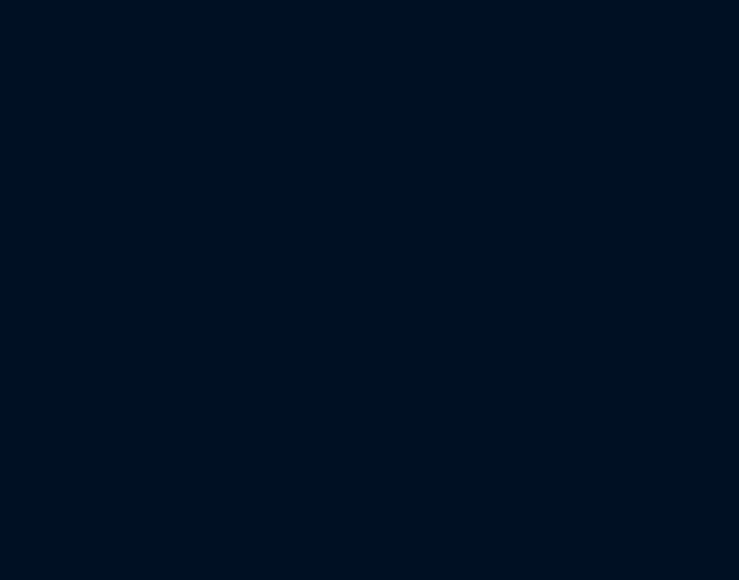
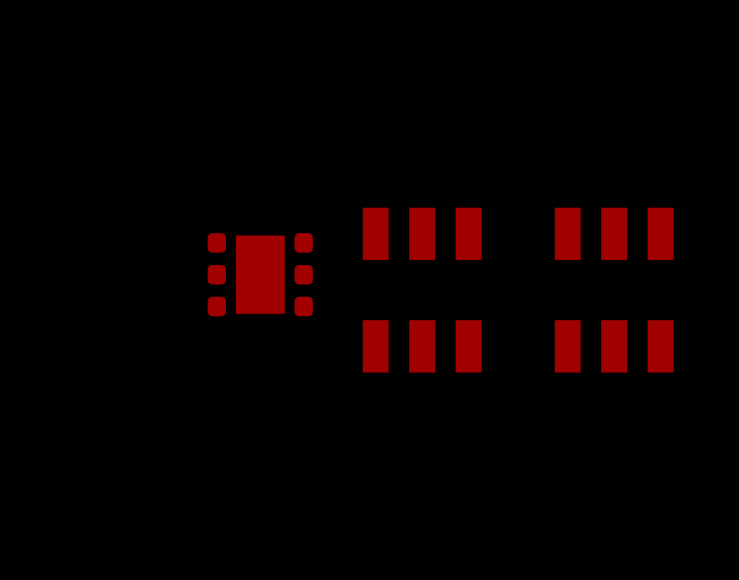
part: none -> (260, 274)
part: none -> (422, 290)
part: none -> (614, 290)

